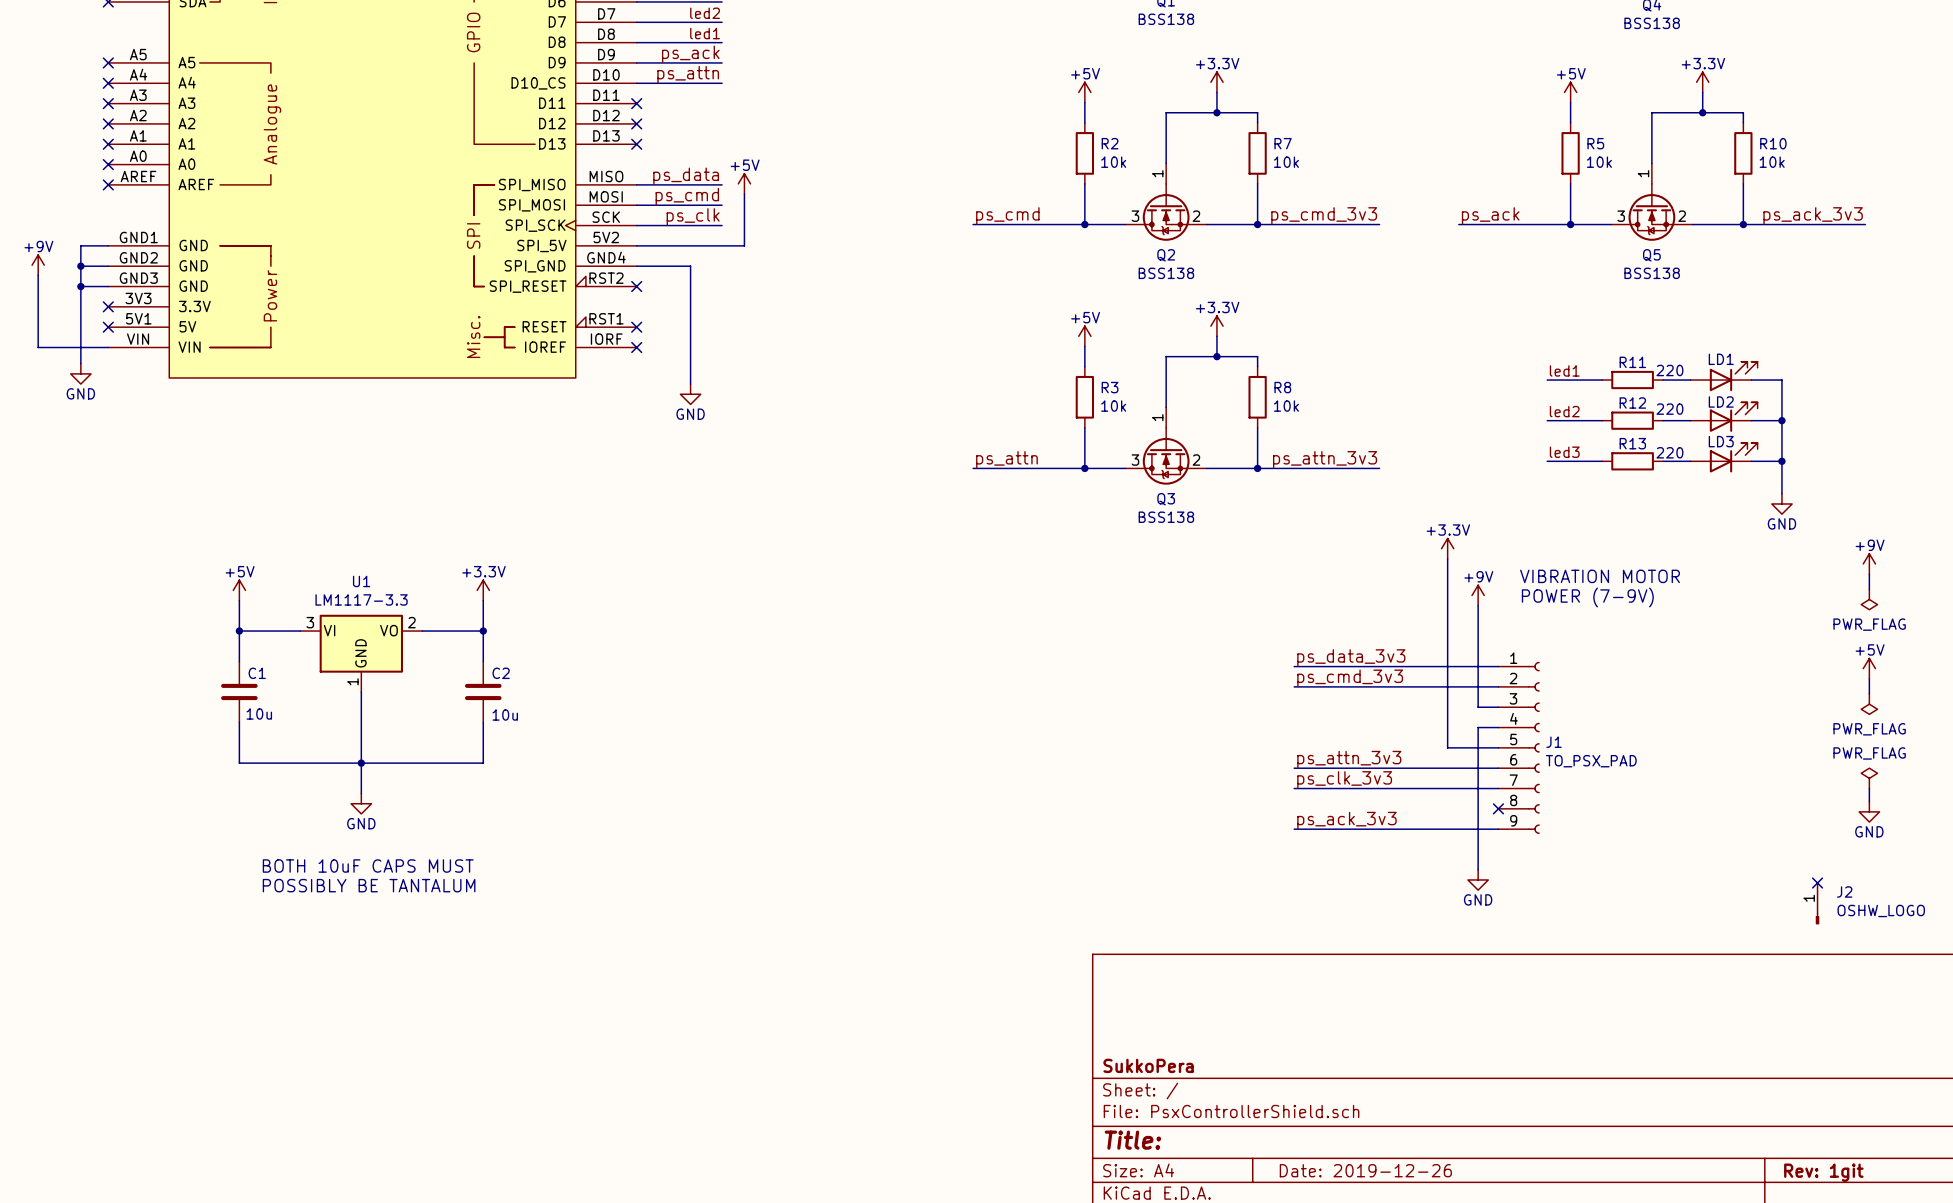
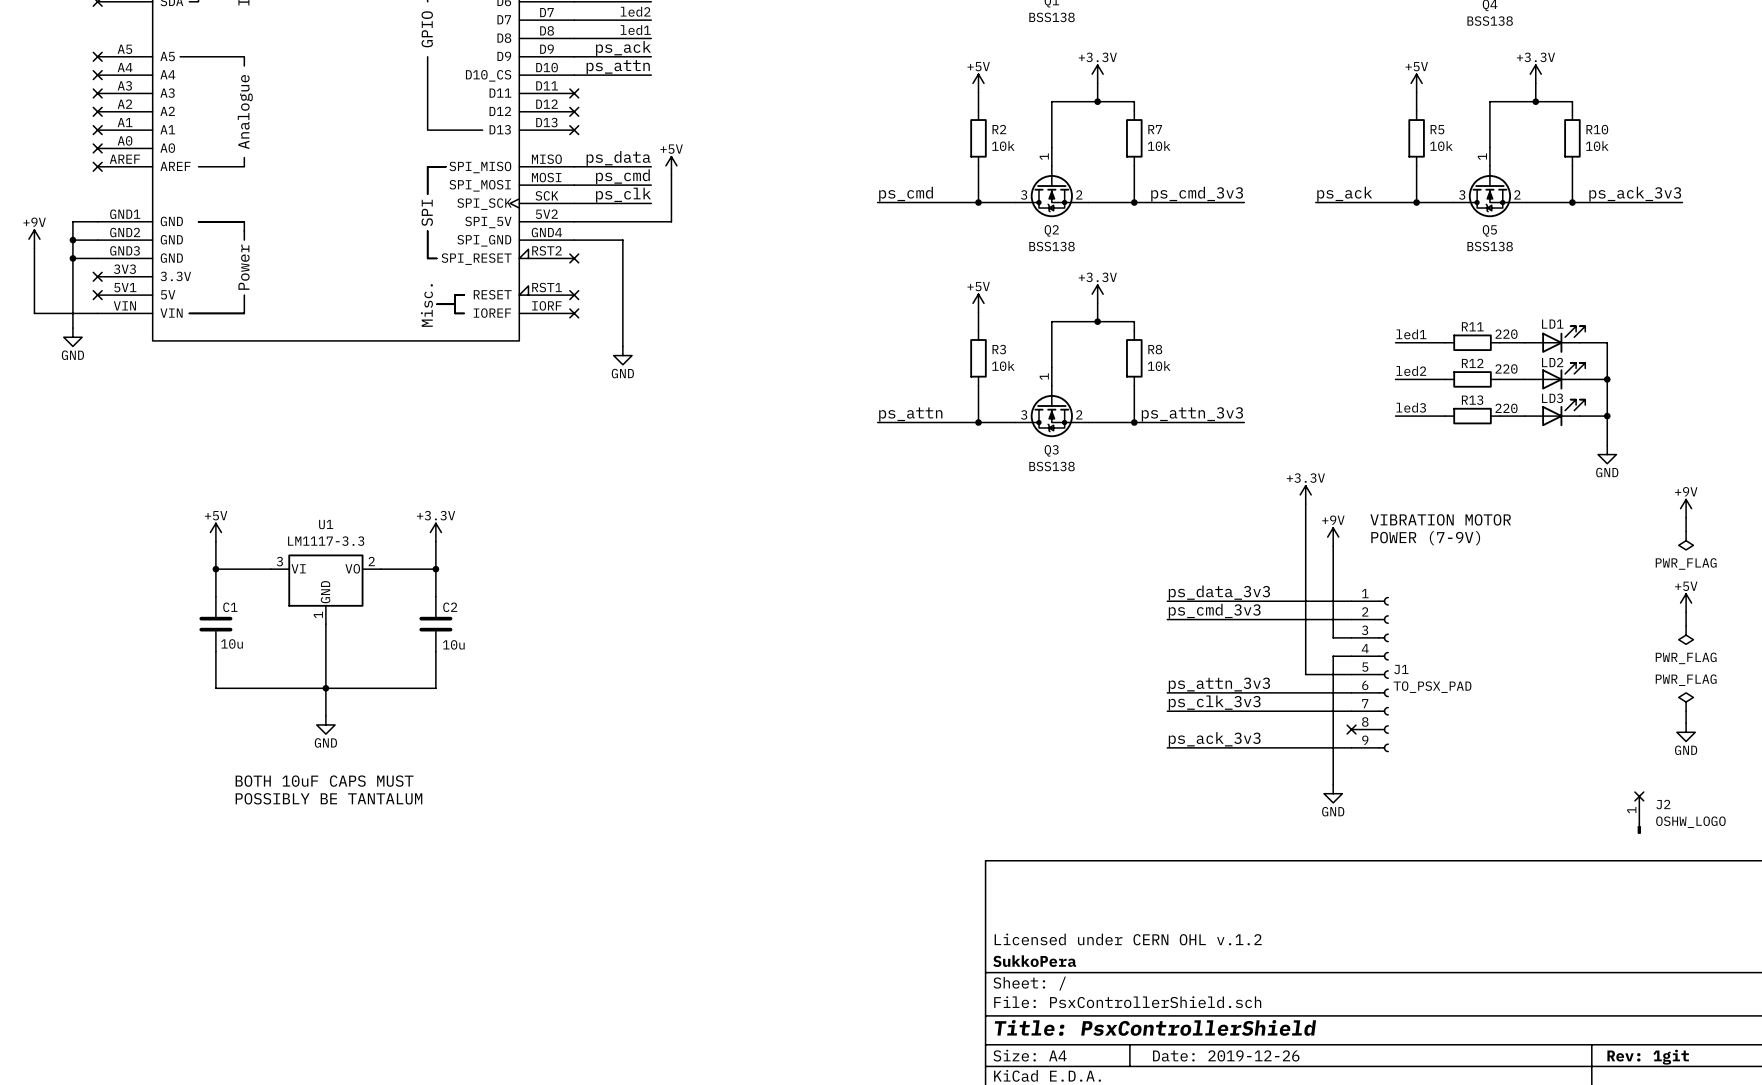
title block: none -> Licensed under CERN OHL v.1.2 (1128, 939)
title block: Title: (1132, 1140) -> Title: PsxControllerShield (1155, 1027)

